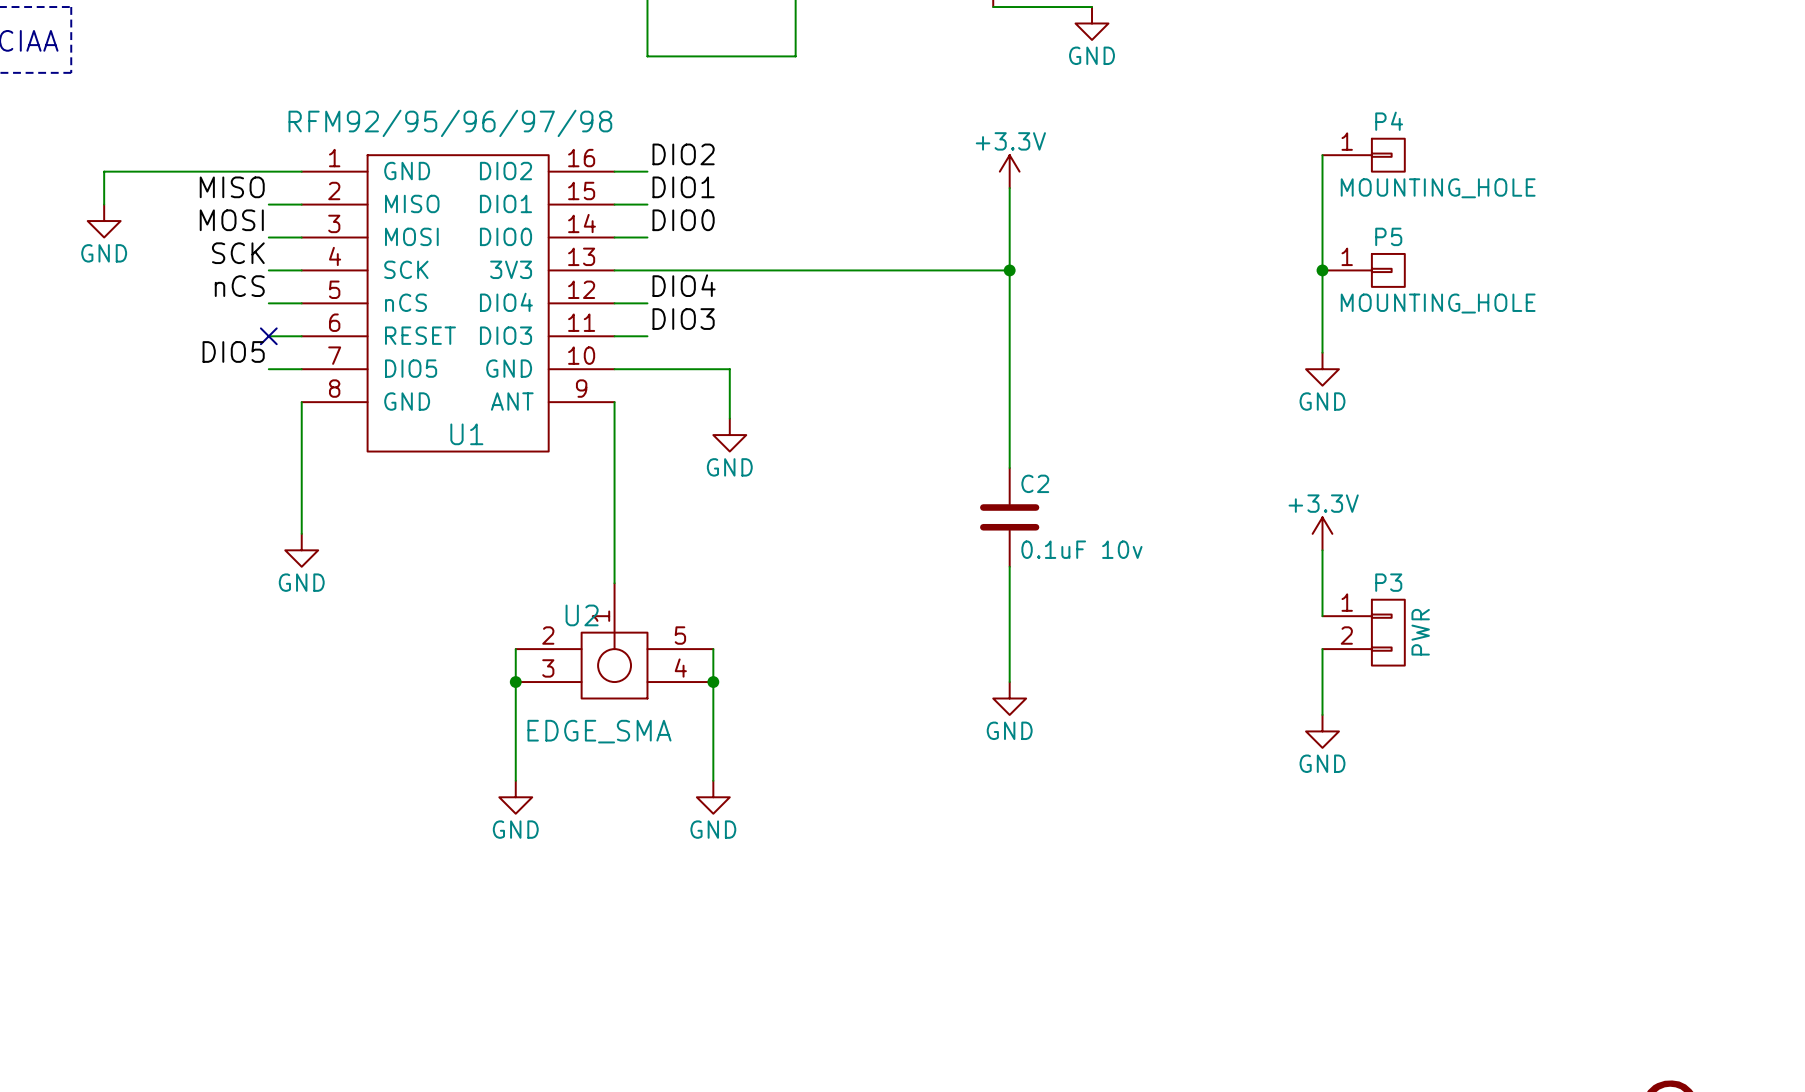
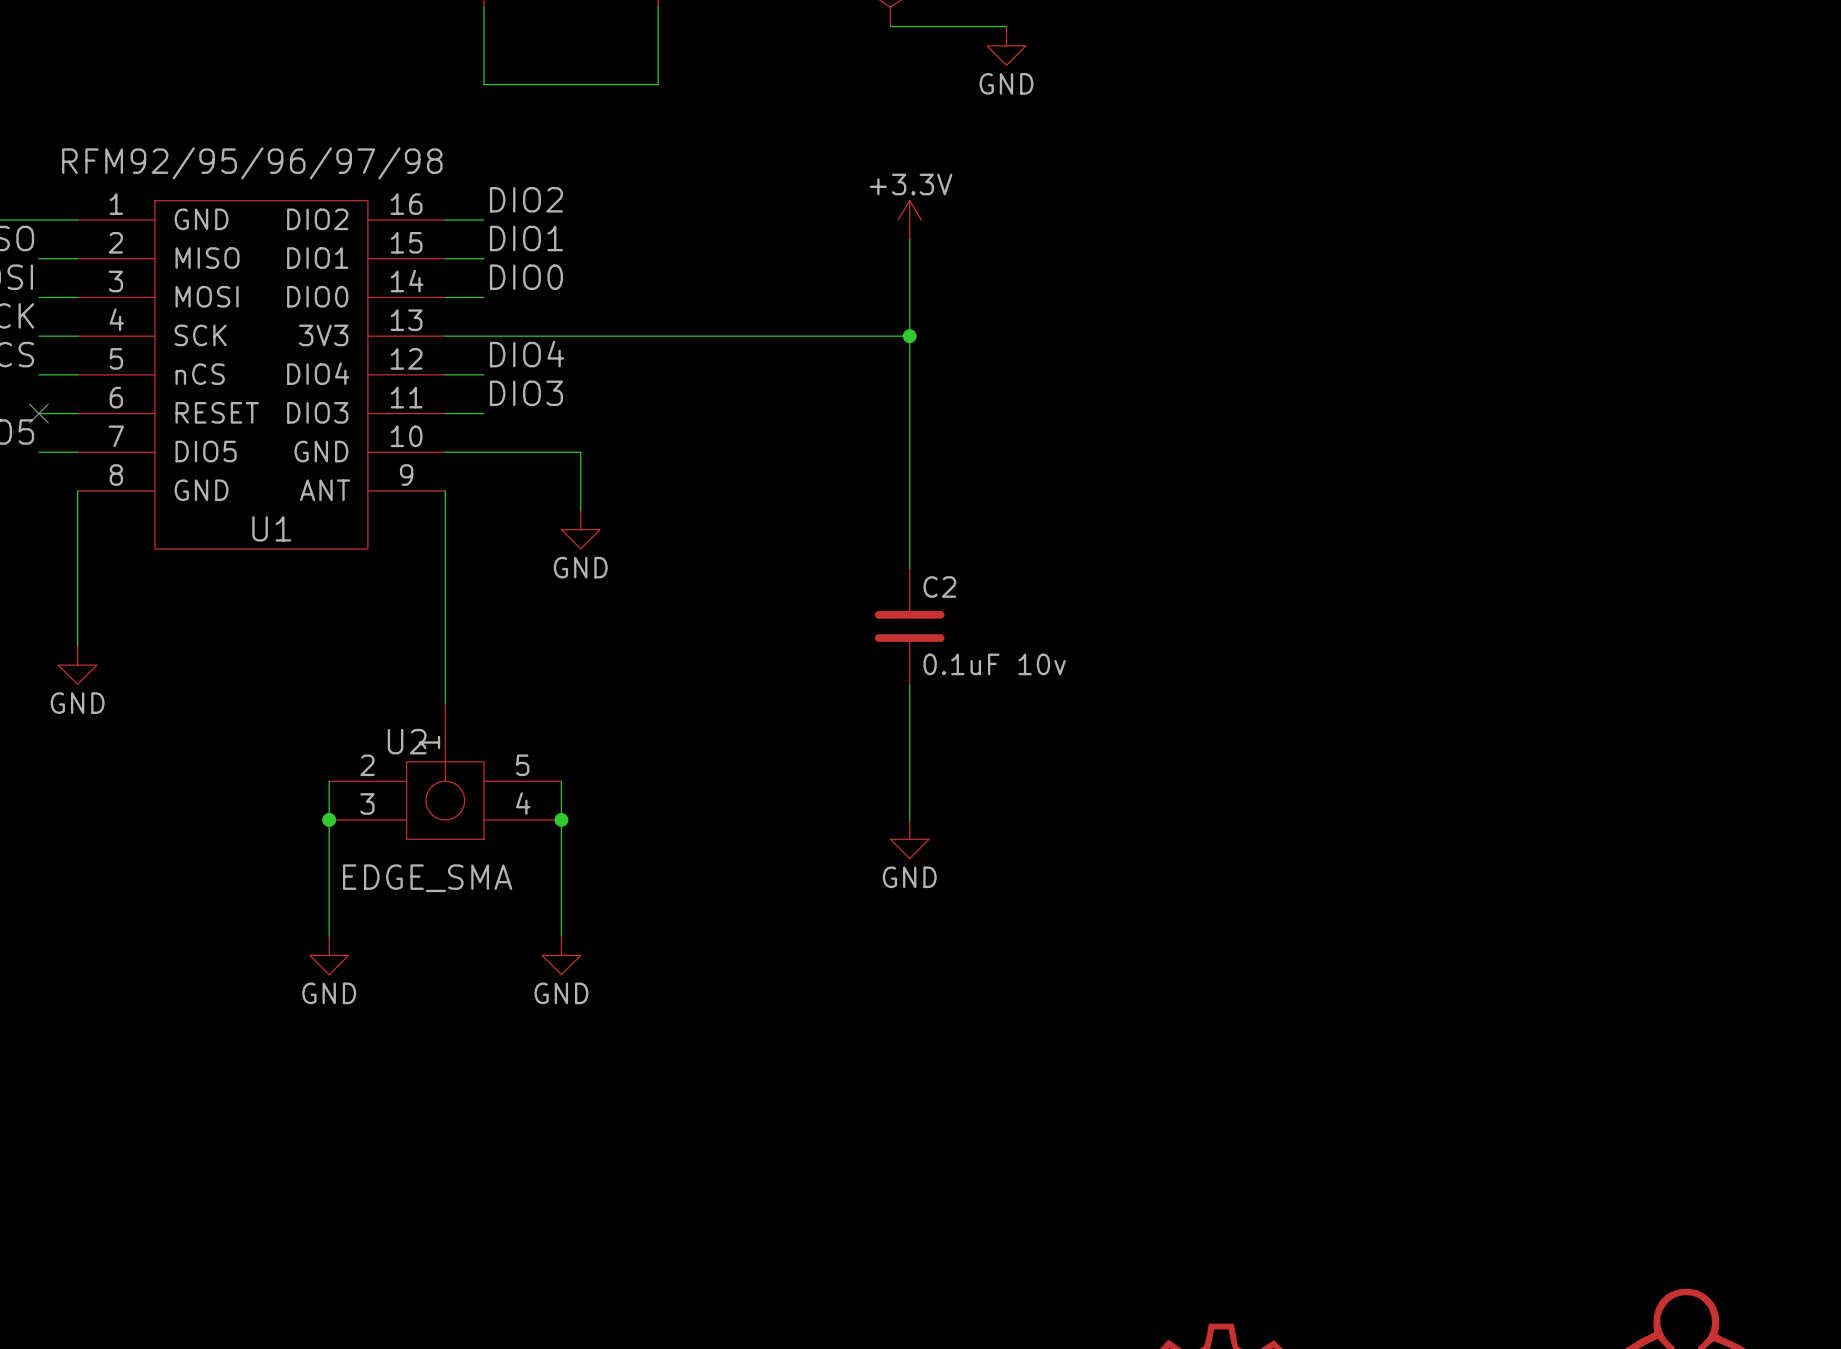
wire: (1322, 155) (1322, 352) -> none
P4: MOUNTING_HOLE (1363, 155) -> none
junction: (1322, 270) -> none
P5: MOUNTING_HOLE (1363, 270) -> none
power symbol: GND (1322, 369) -> none
power symbol: +3.3V (1322, 533) -> none
wire: (1322, 550) (1322, 616) -> none
P3: PWR (1363, 632) -> none
wire: (1322, 649) (1322, 714) -> none
power symbol: GND (1322, 731) -> none

